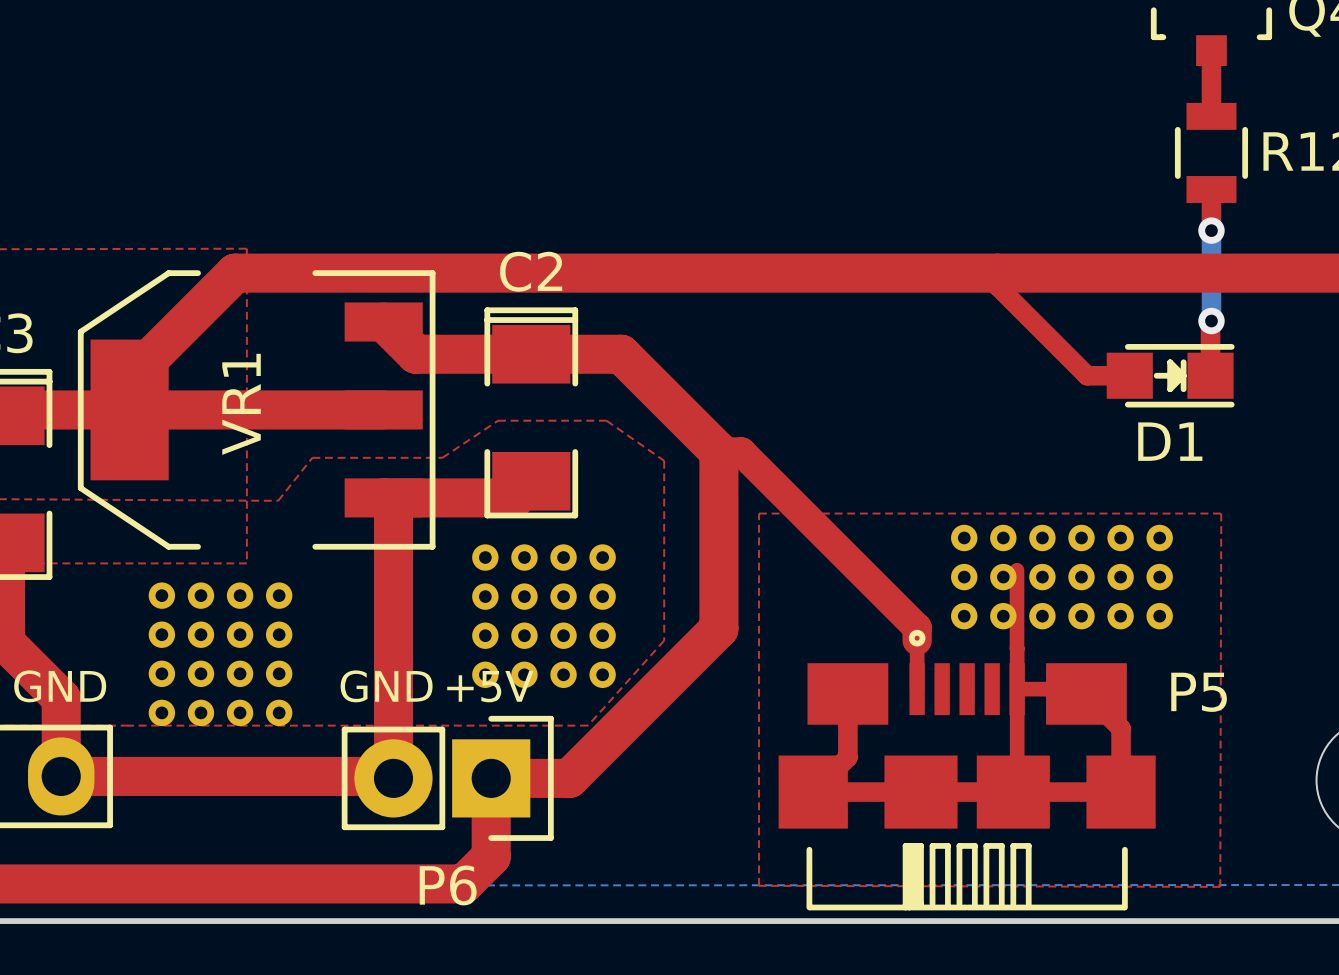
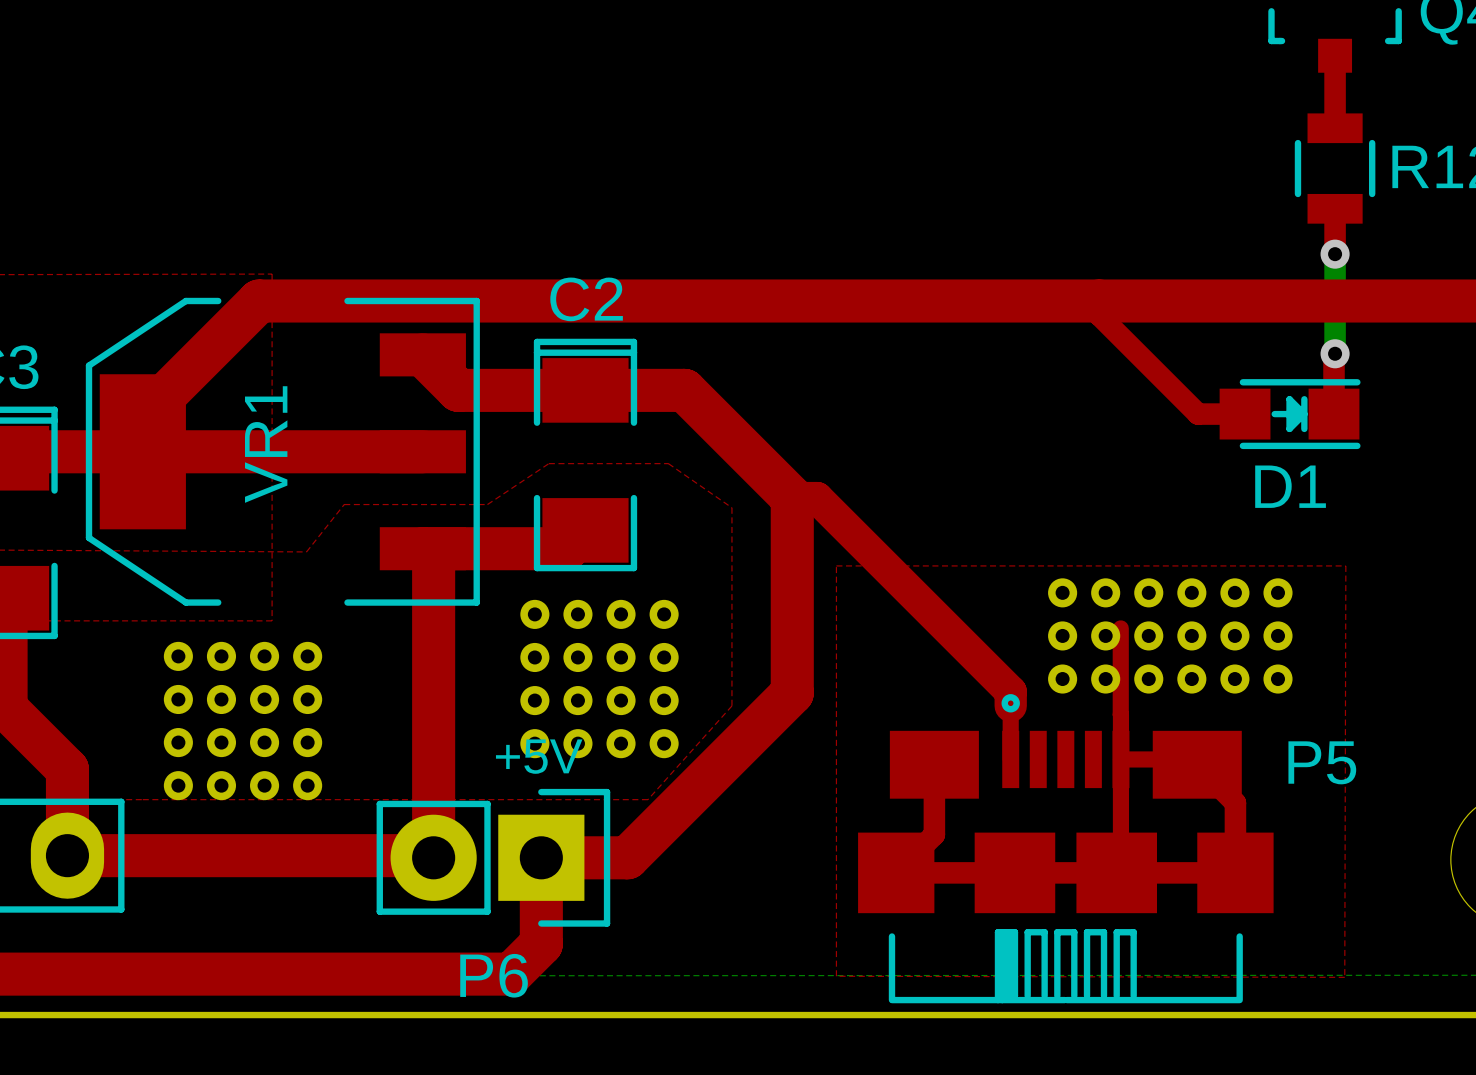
text: GND (60, 686) -> none
text: GND (386, 686) -> none

